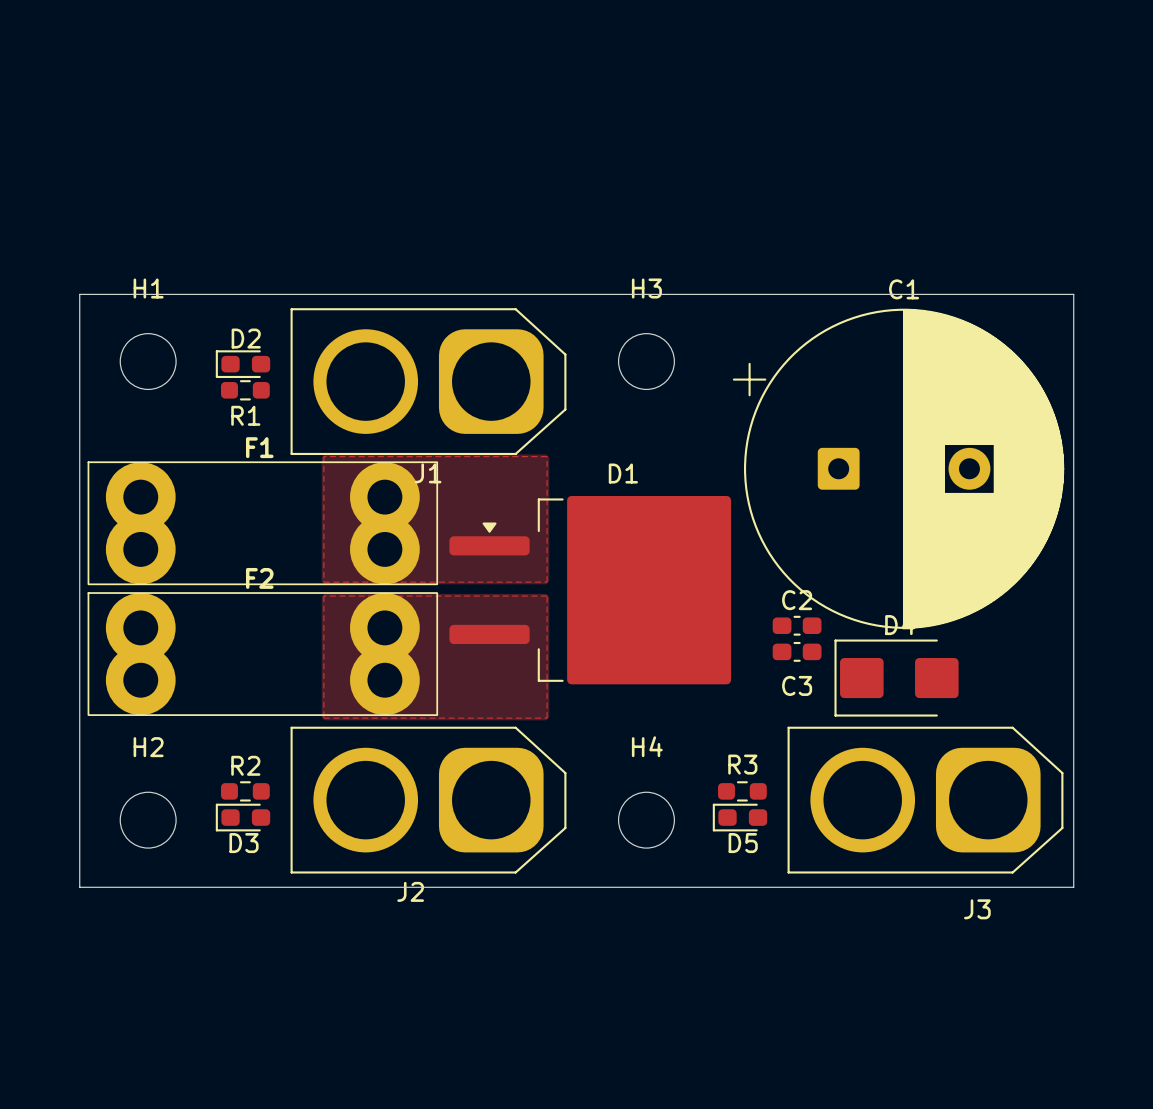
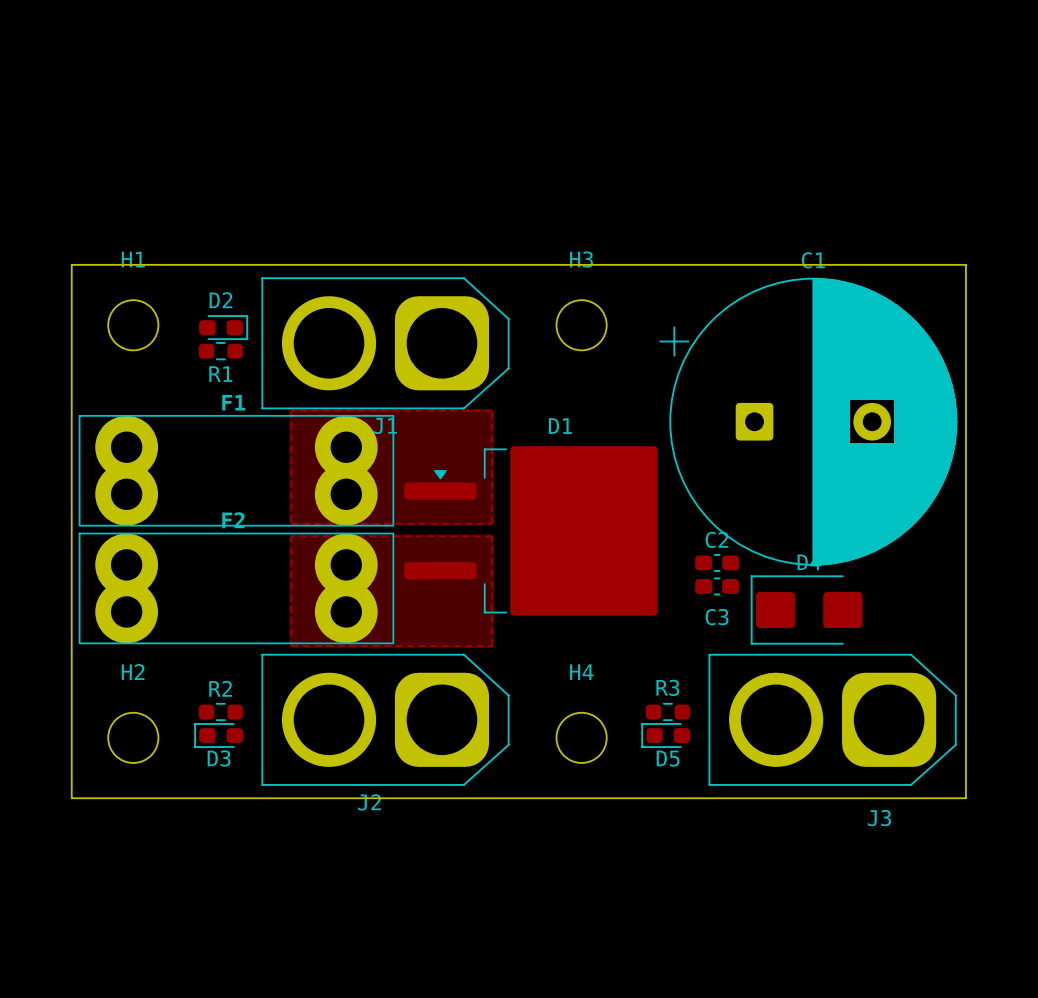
D2 rotation: 0° (243, 364) -> 180° (223, 327)

